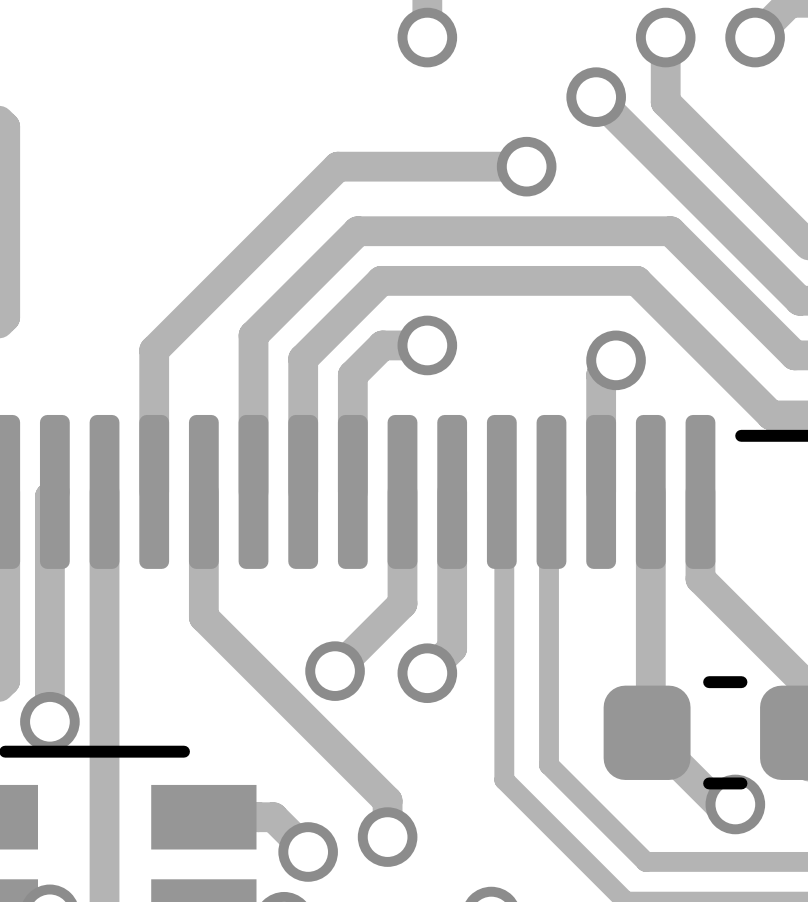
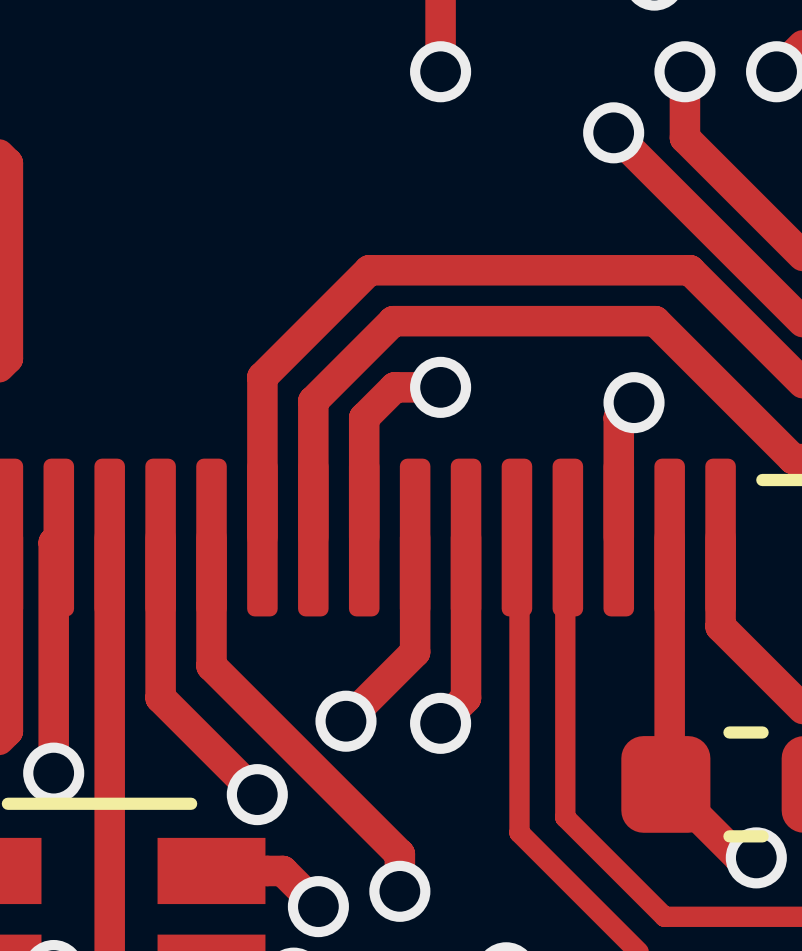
track: (526, 166) (337, 166) (154, 350) (154, 491) -> (257, 794) (160, 697) (160, 537)
via: (526, 166) -> none
via: none -> (257, 794)

